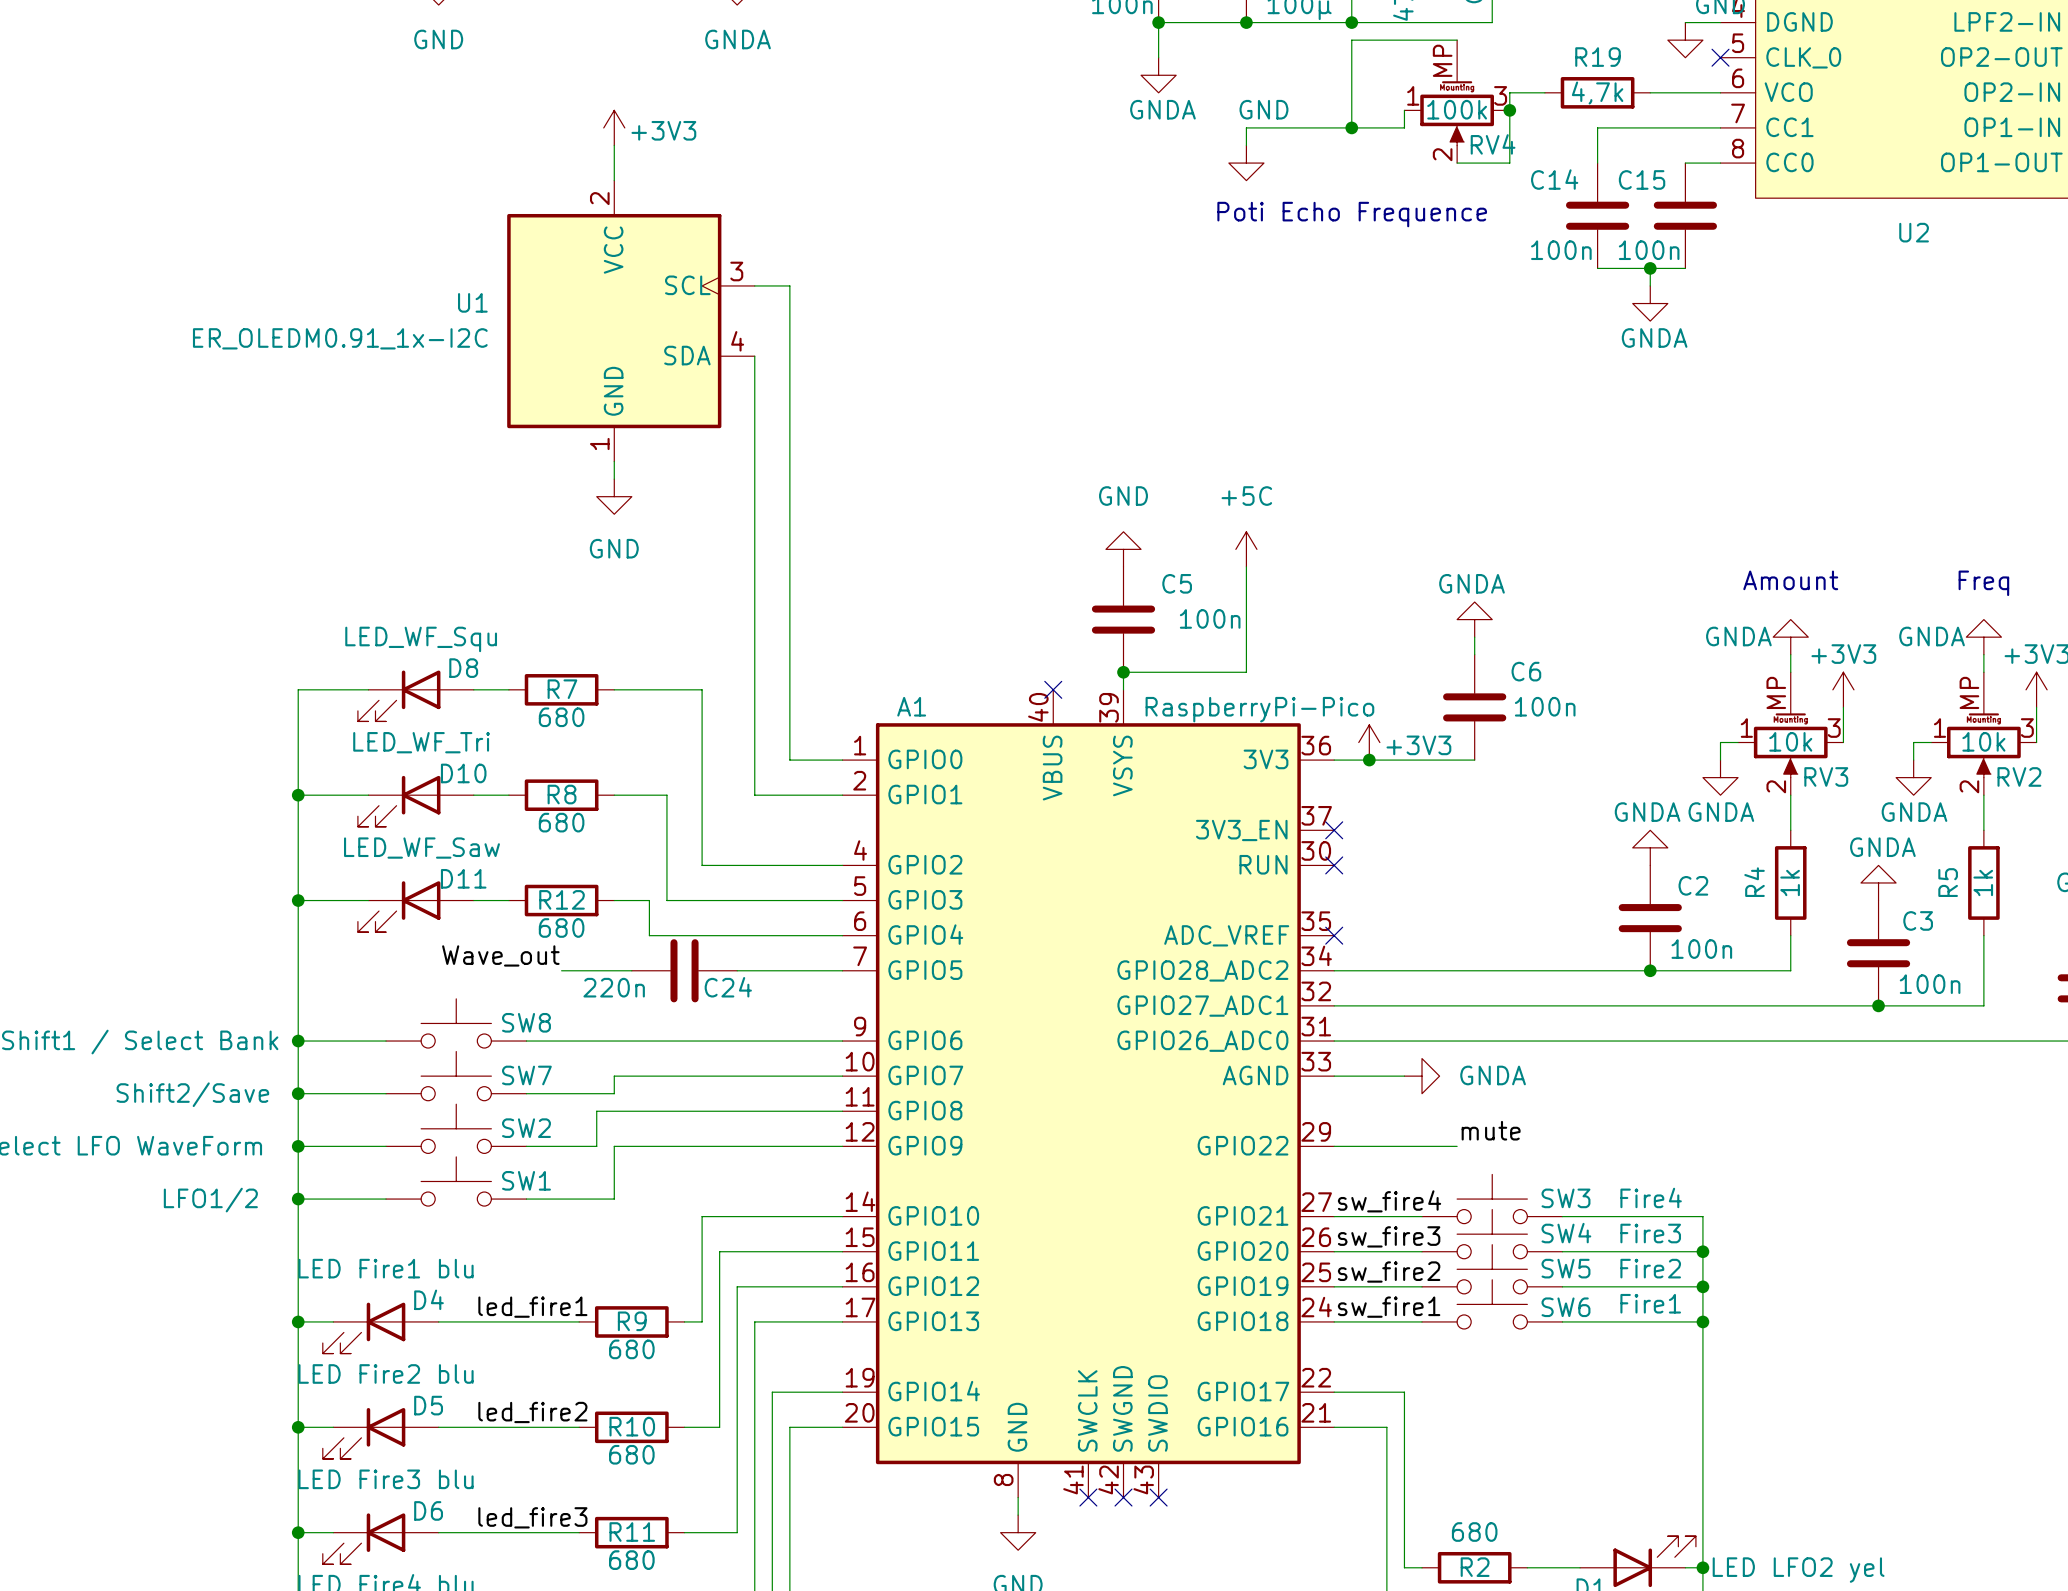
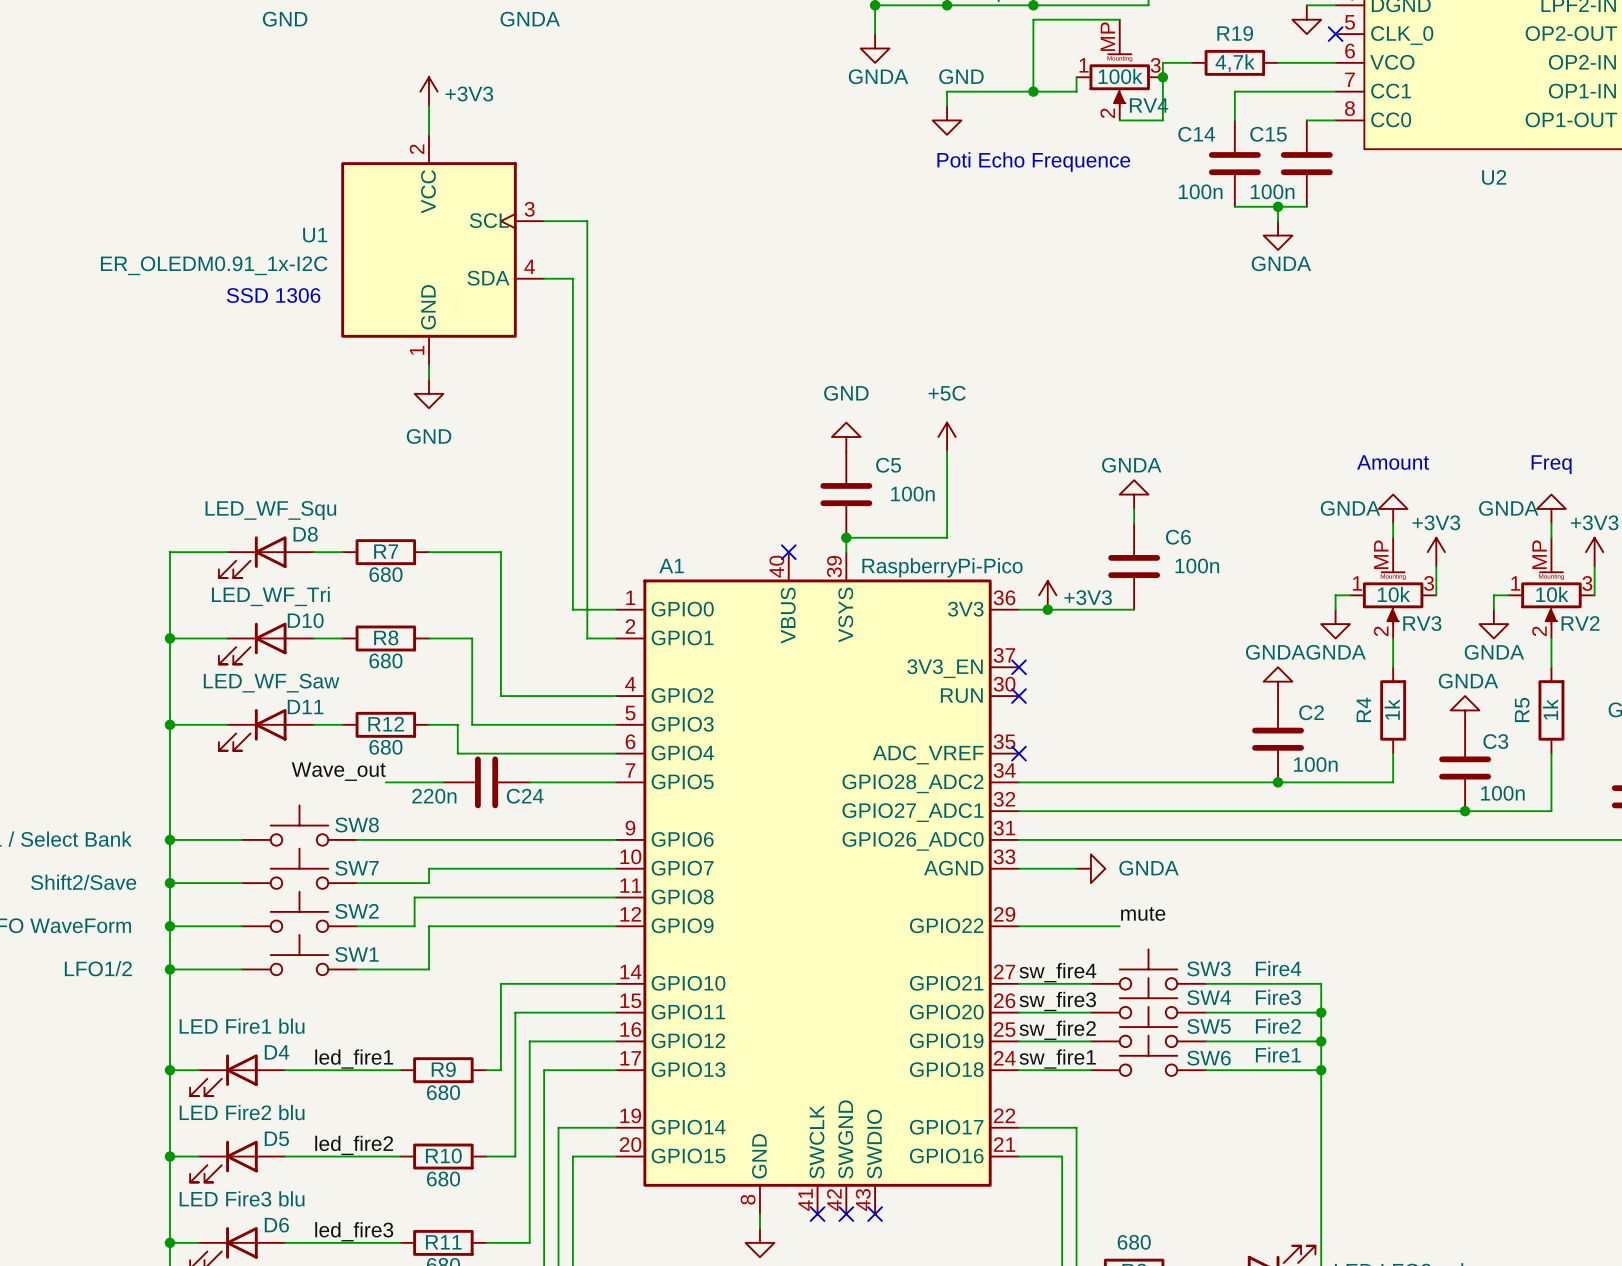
wire: (789, 285) (789, 356) -> (544, 278) (572, 278)
wire: (754, 356) (754, 795) (807, 795) -> (572, 221) (587, 221) (587, 638)
text: none -> SSD 1306 (273, 295)

